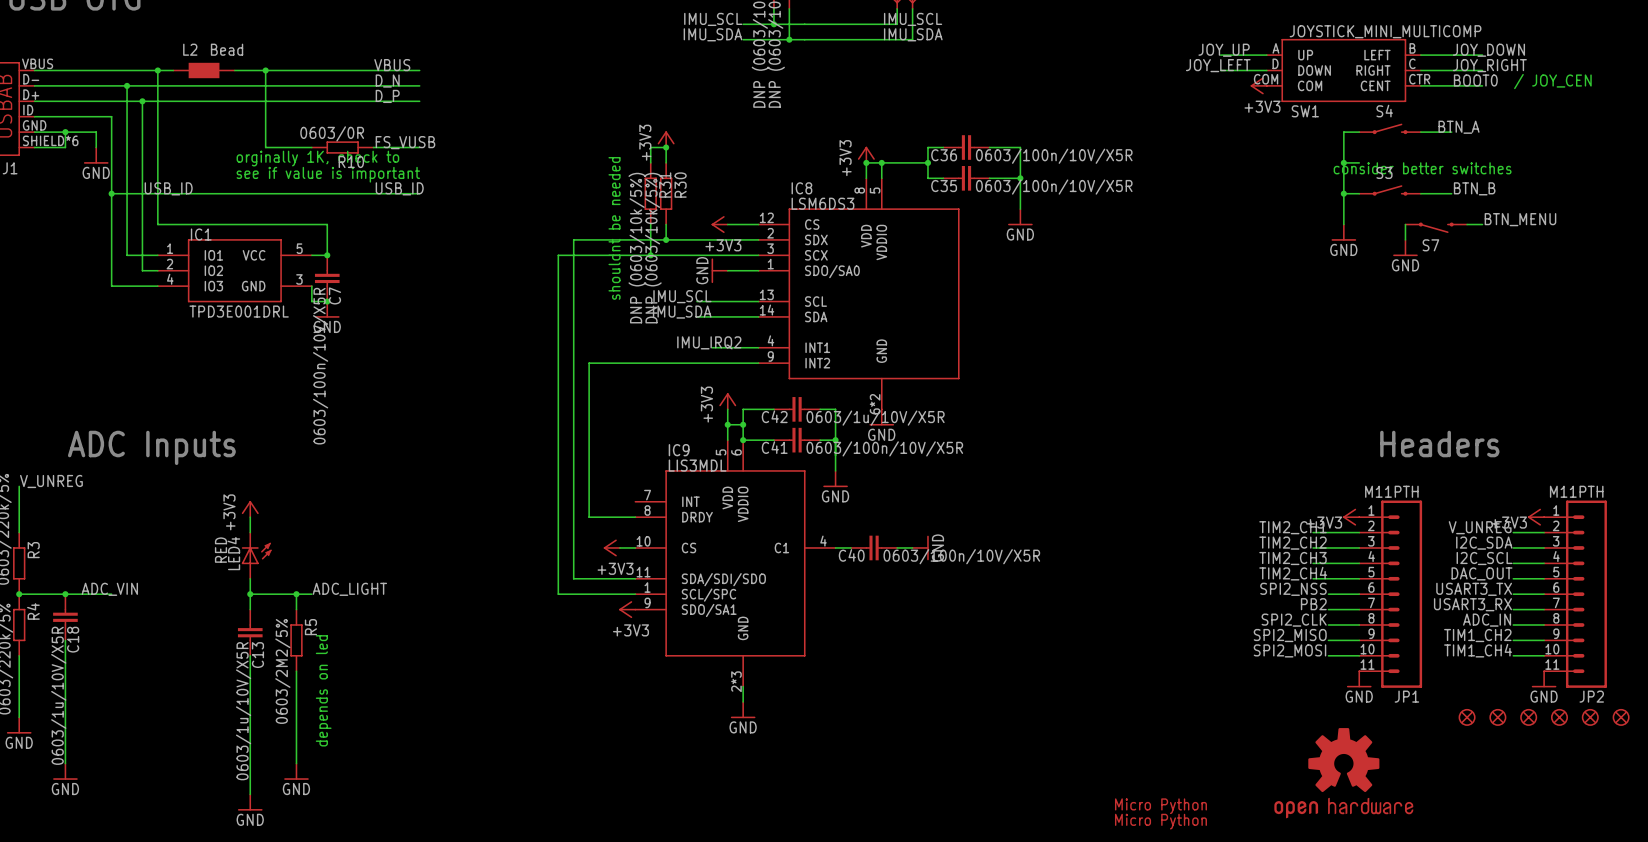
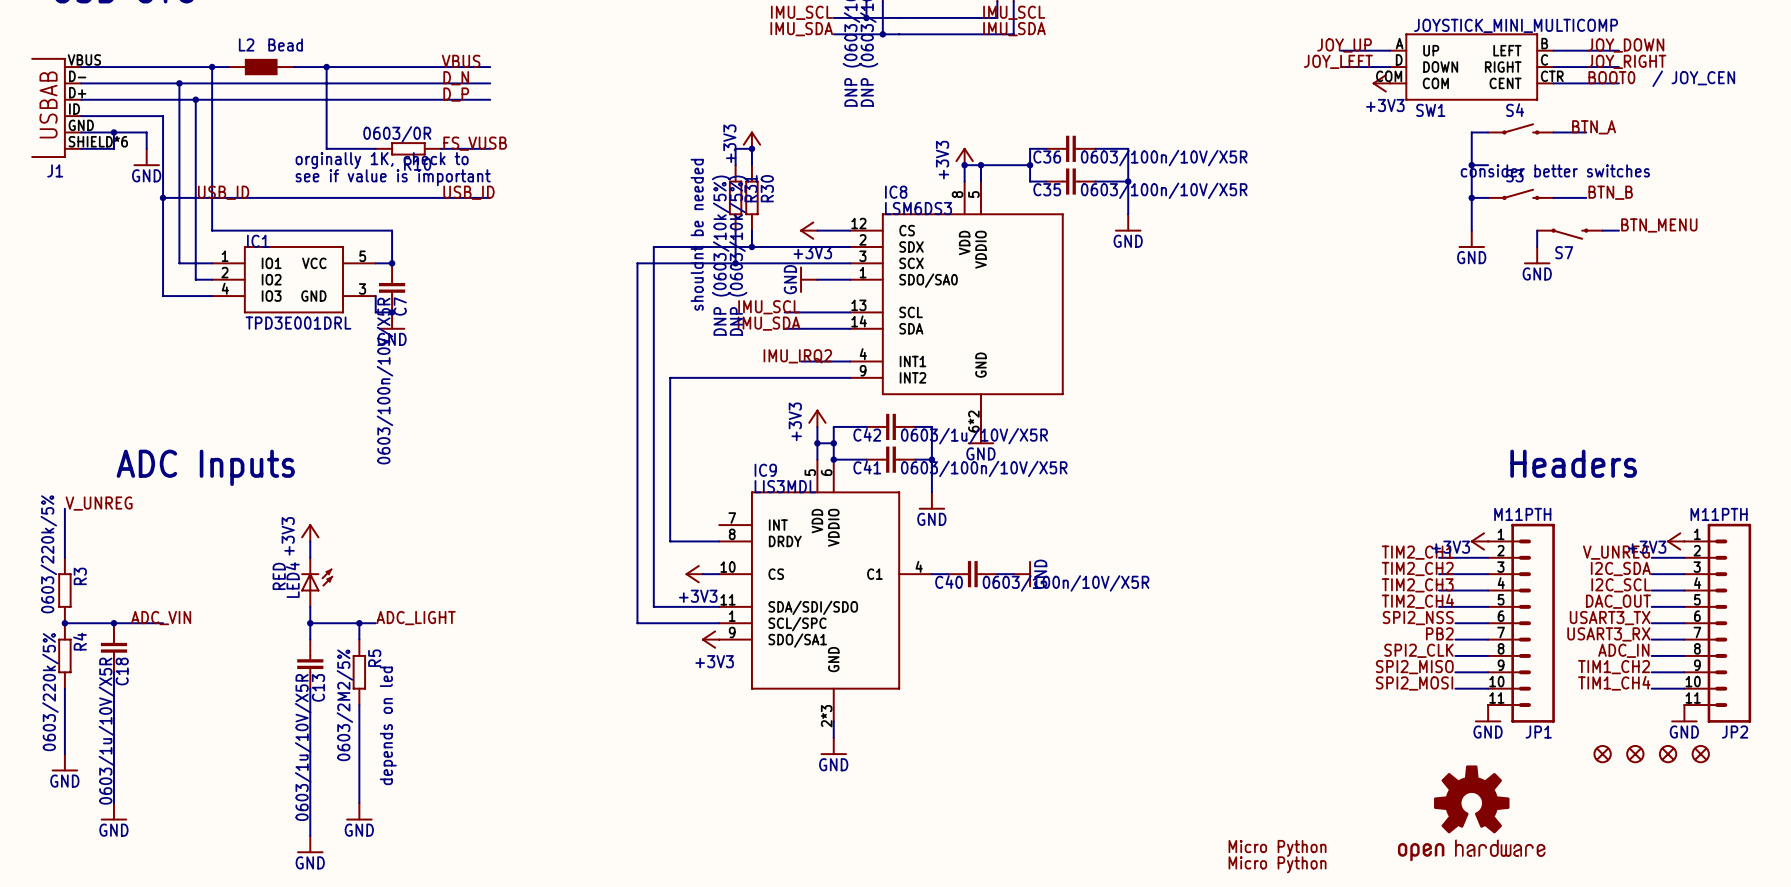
part: (1590, 717) -> none
part: (1621, 717) -> none

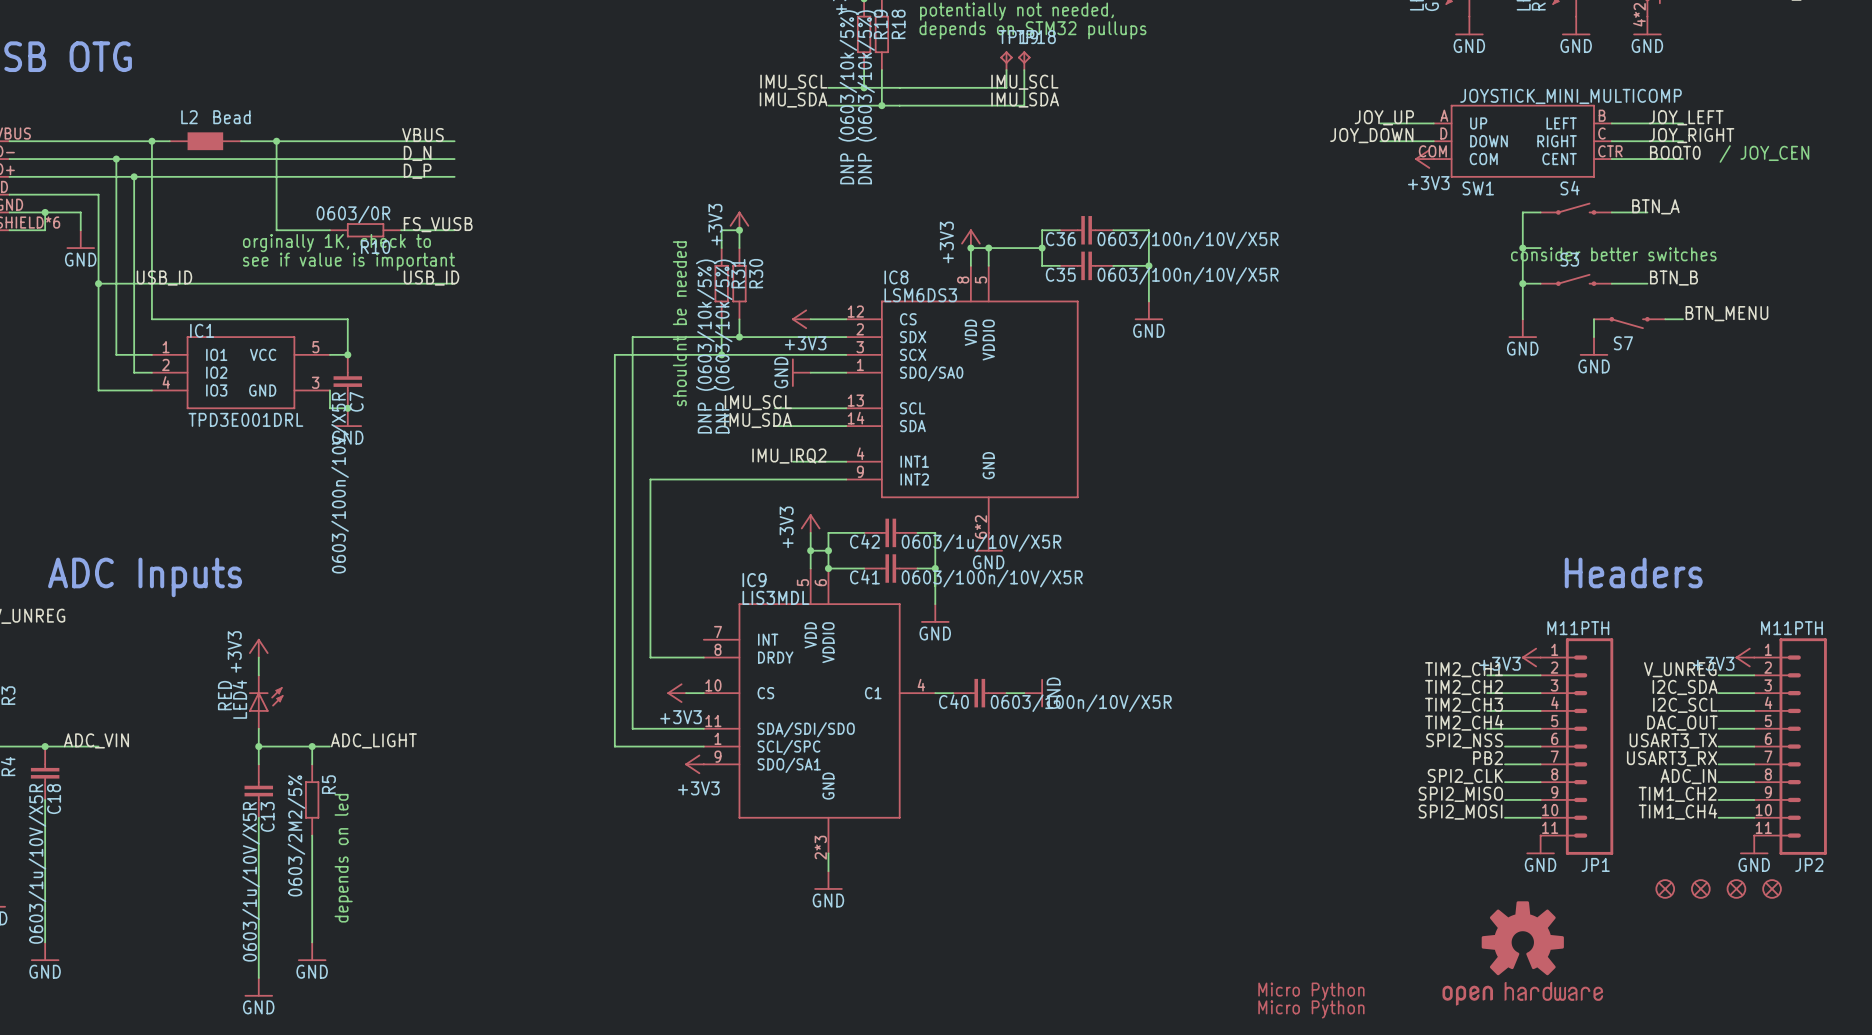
label: JOY_DOWN (1625, 45) -> JOY_LEFT (1686, 117)
label: JOY_LEFT (1338, 61) -> JOY_DOWN (1371, 135)

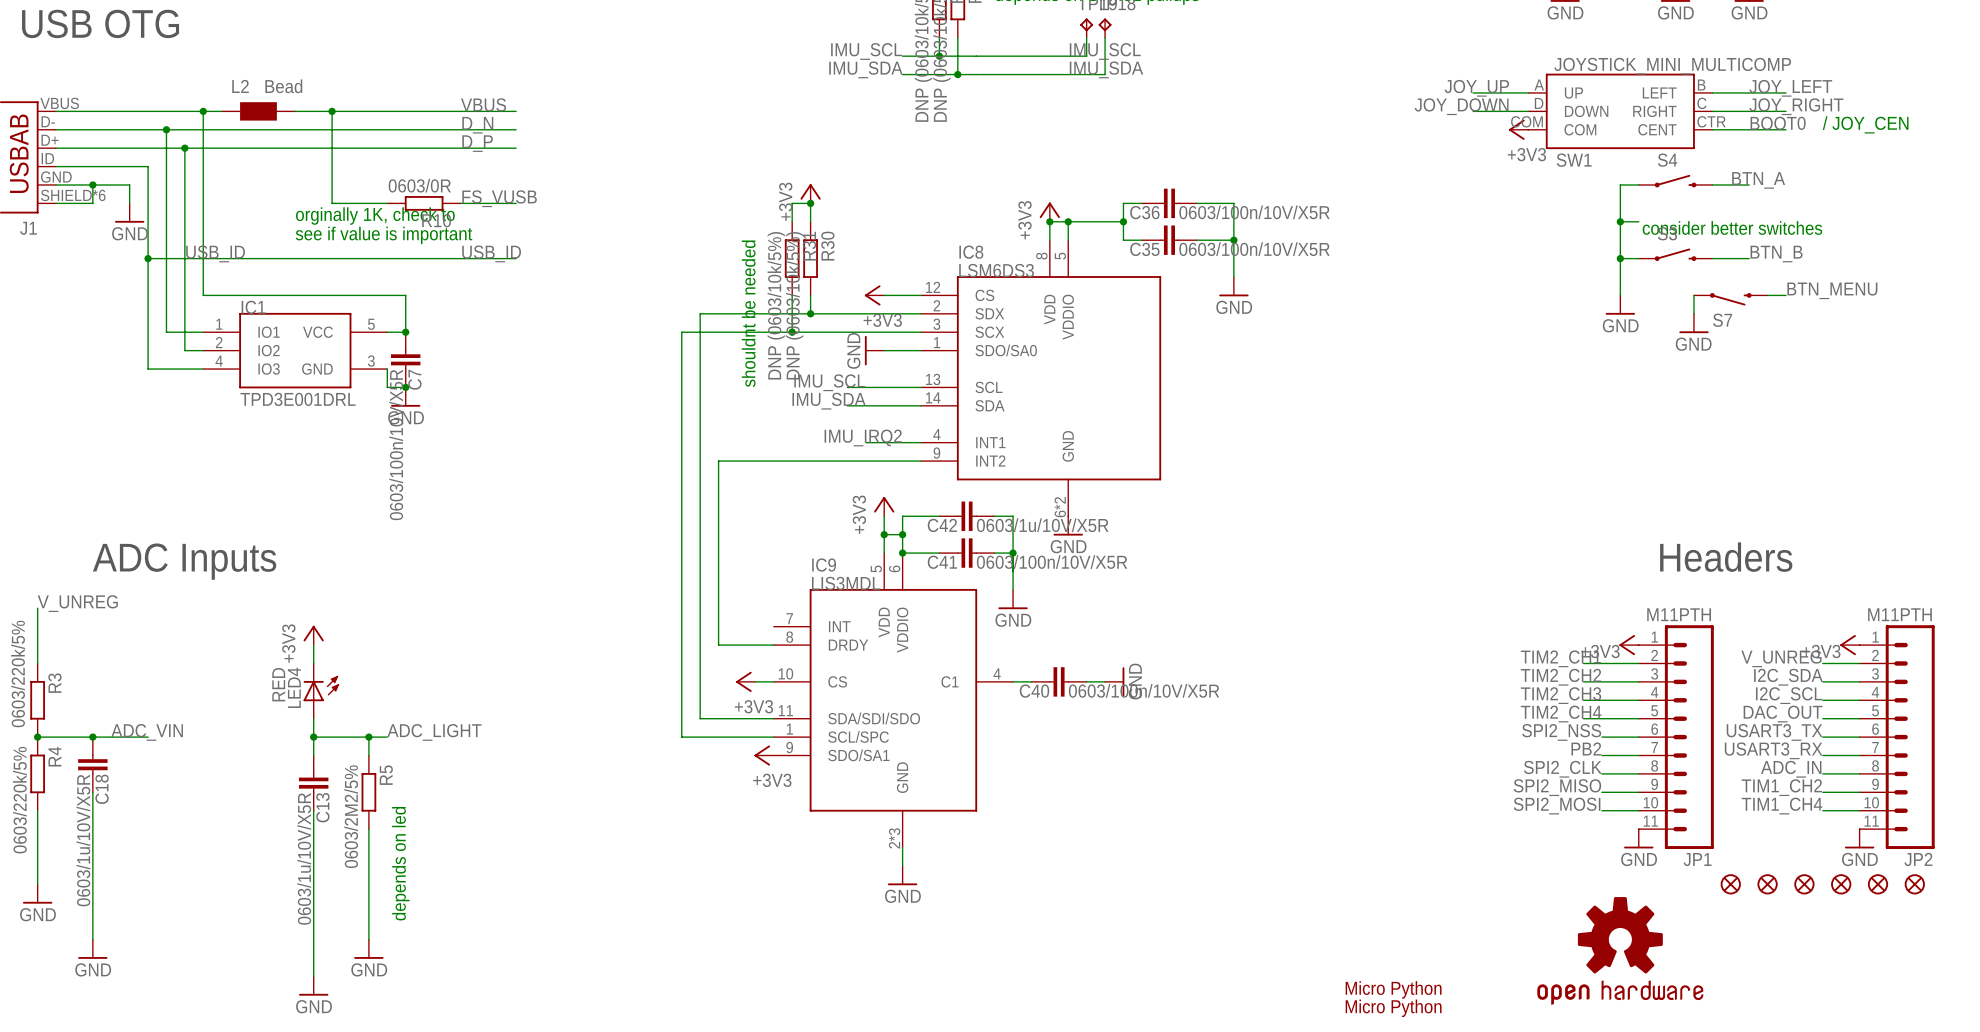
part: none -> (1730, 884)
part: none -> (1914, 884)

